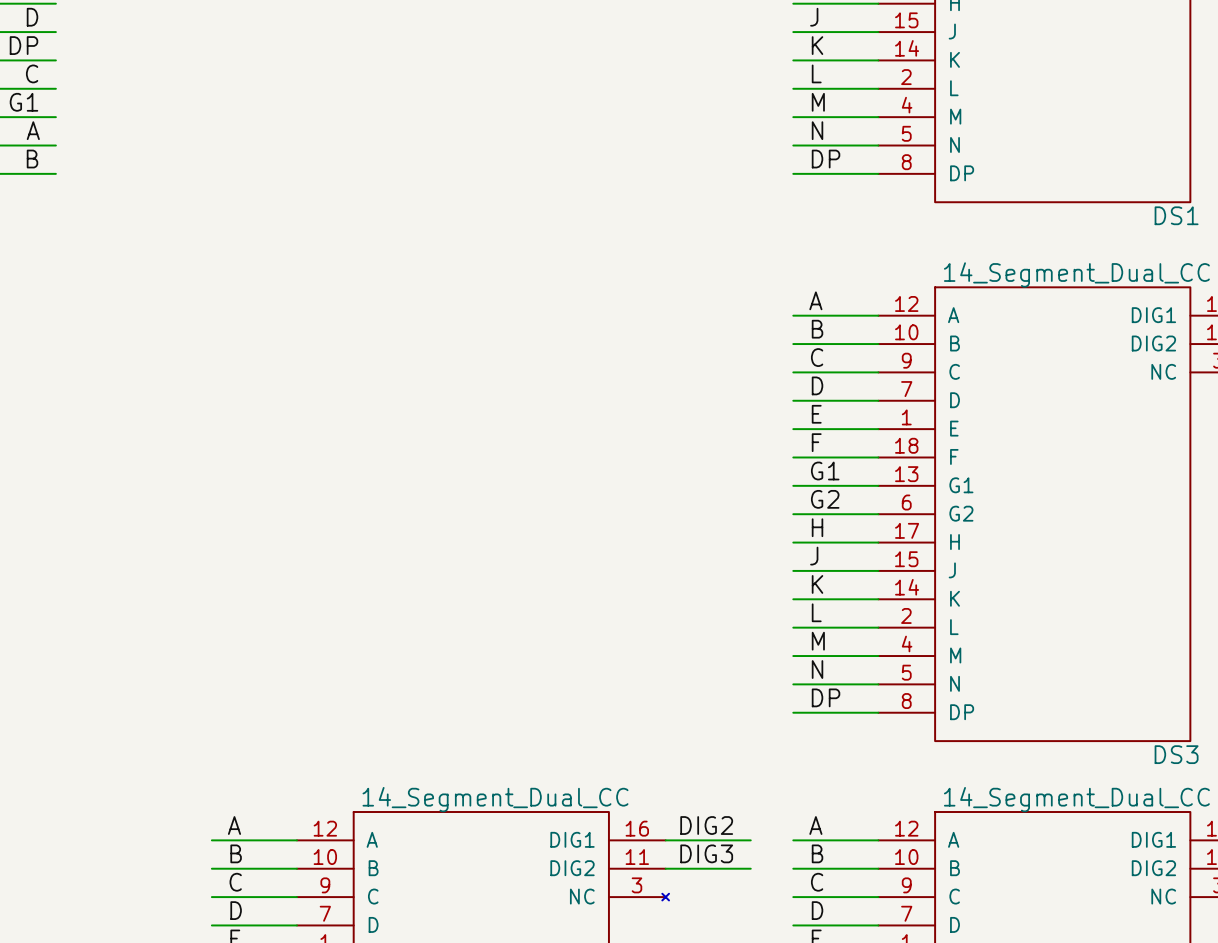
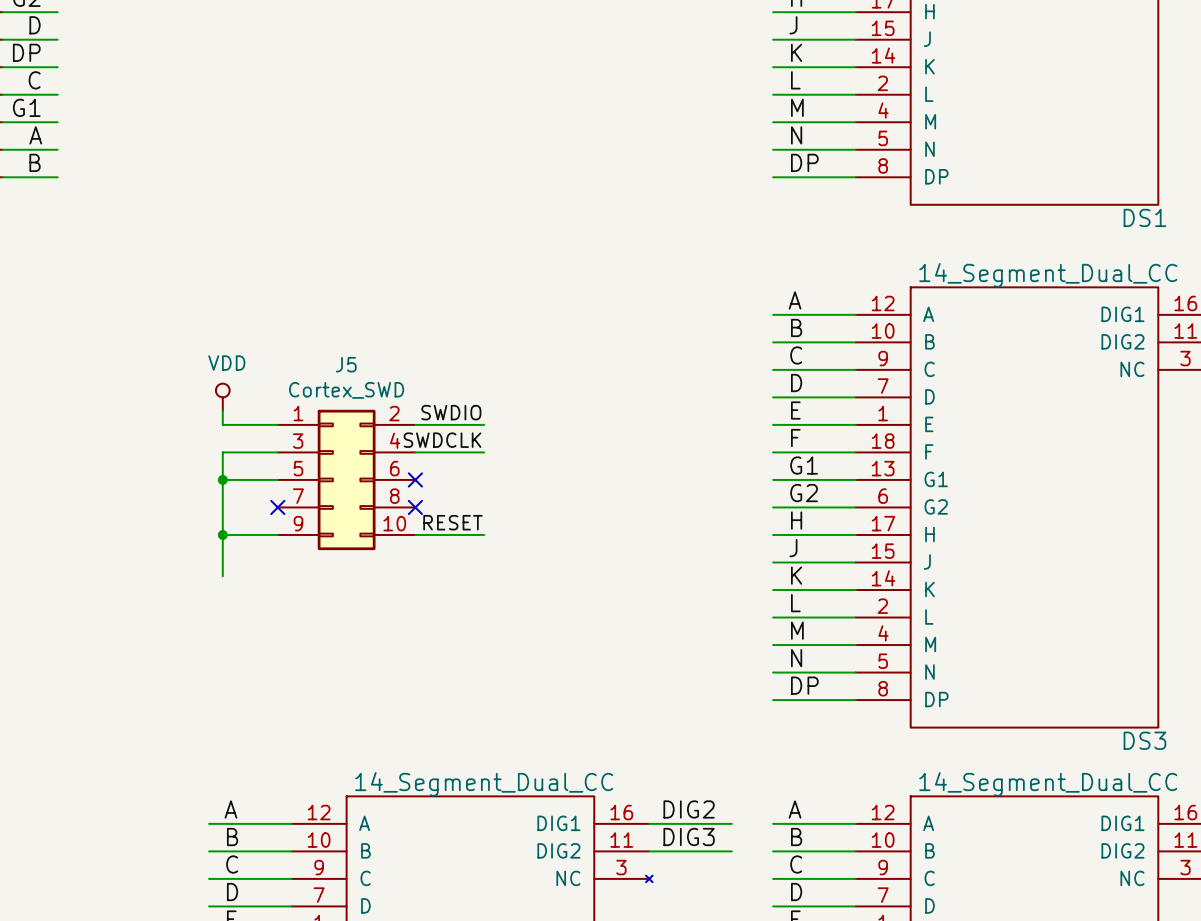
power symbol: none -> VDD (222, 397)
wire: none -> (222, 411) (222, 424) (277, 424)
label: none -> SWDIO (451, 412)
wire: none -> (415, 424) (484, 424)
label: none -> SWDCLK (442, 440)
wire: none -> (277, 452) (222, 452) (222, 576)
wire: none -> (415, 452) (484, 452)
wire: none -> (222, 479) (277, 479)
junction: none -> (222, 479)
J5: none -> Cortex_SWD (346, 479)
no-connect mark: none -> (415, 479)
no-connect mark: none -> (277, 507)
no-connect mark: none -> (415, 507)
label: none -> RESET (452, 522)
wire: none -> (222, 534) (277, 534)
junction: none -> (222, 534)
wire: none -> (415, 534) (484, 534)

